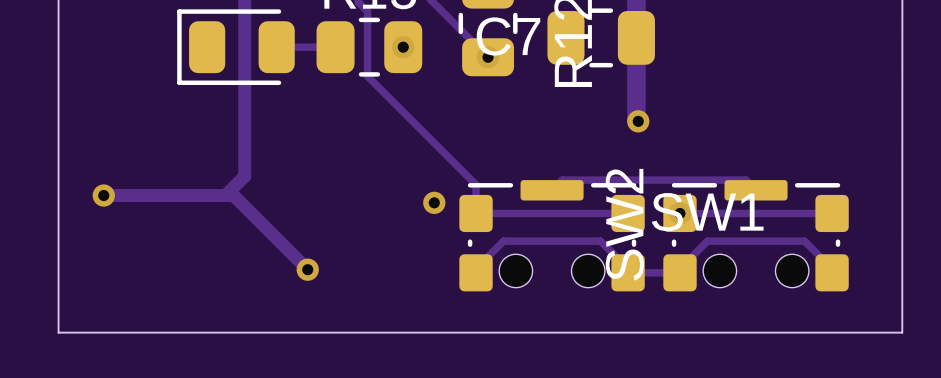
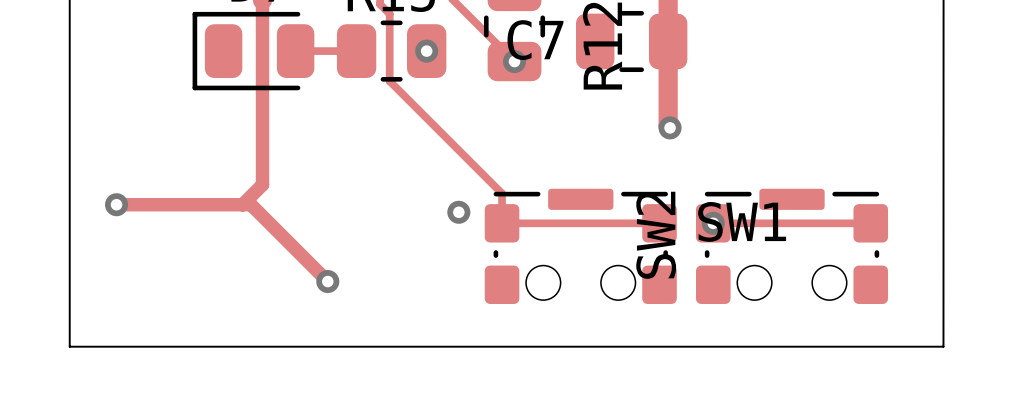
track: (552, 190) (562, 180) (745, 180) (756, 190) -> none
track: (476, 272) (476, 268) (503, 241) (600, 241) (628, 268) (628, 272) (680, 272) (680, 268) (707, 241) (804, 241) (832, 268) (832, 272) -> none

